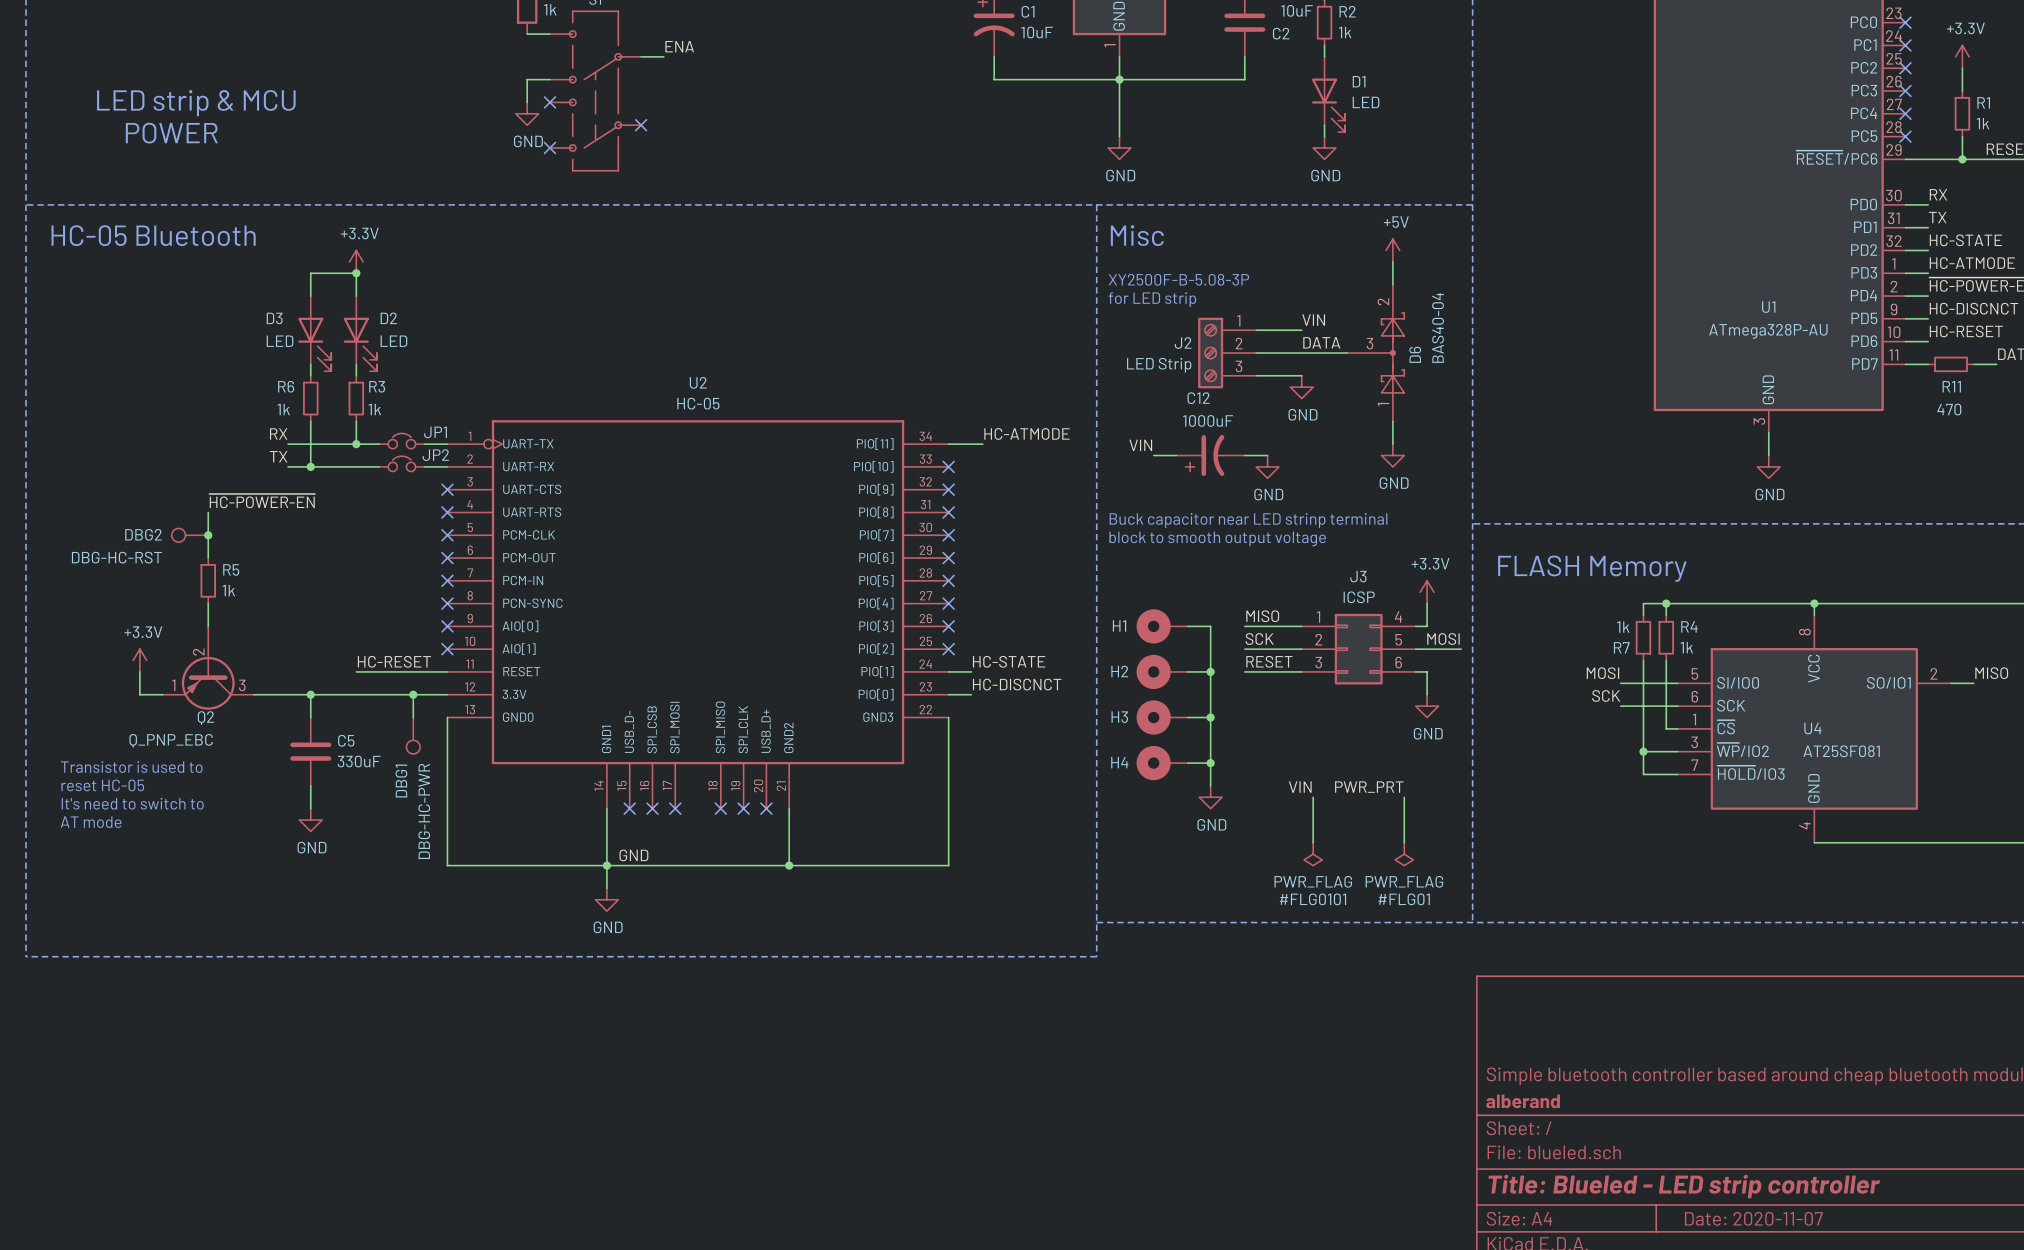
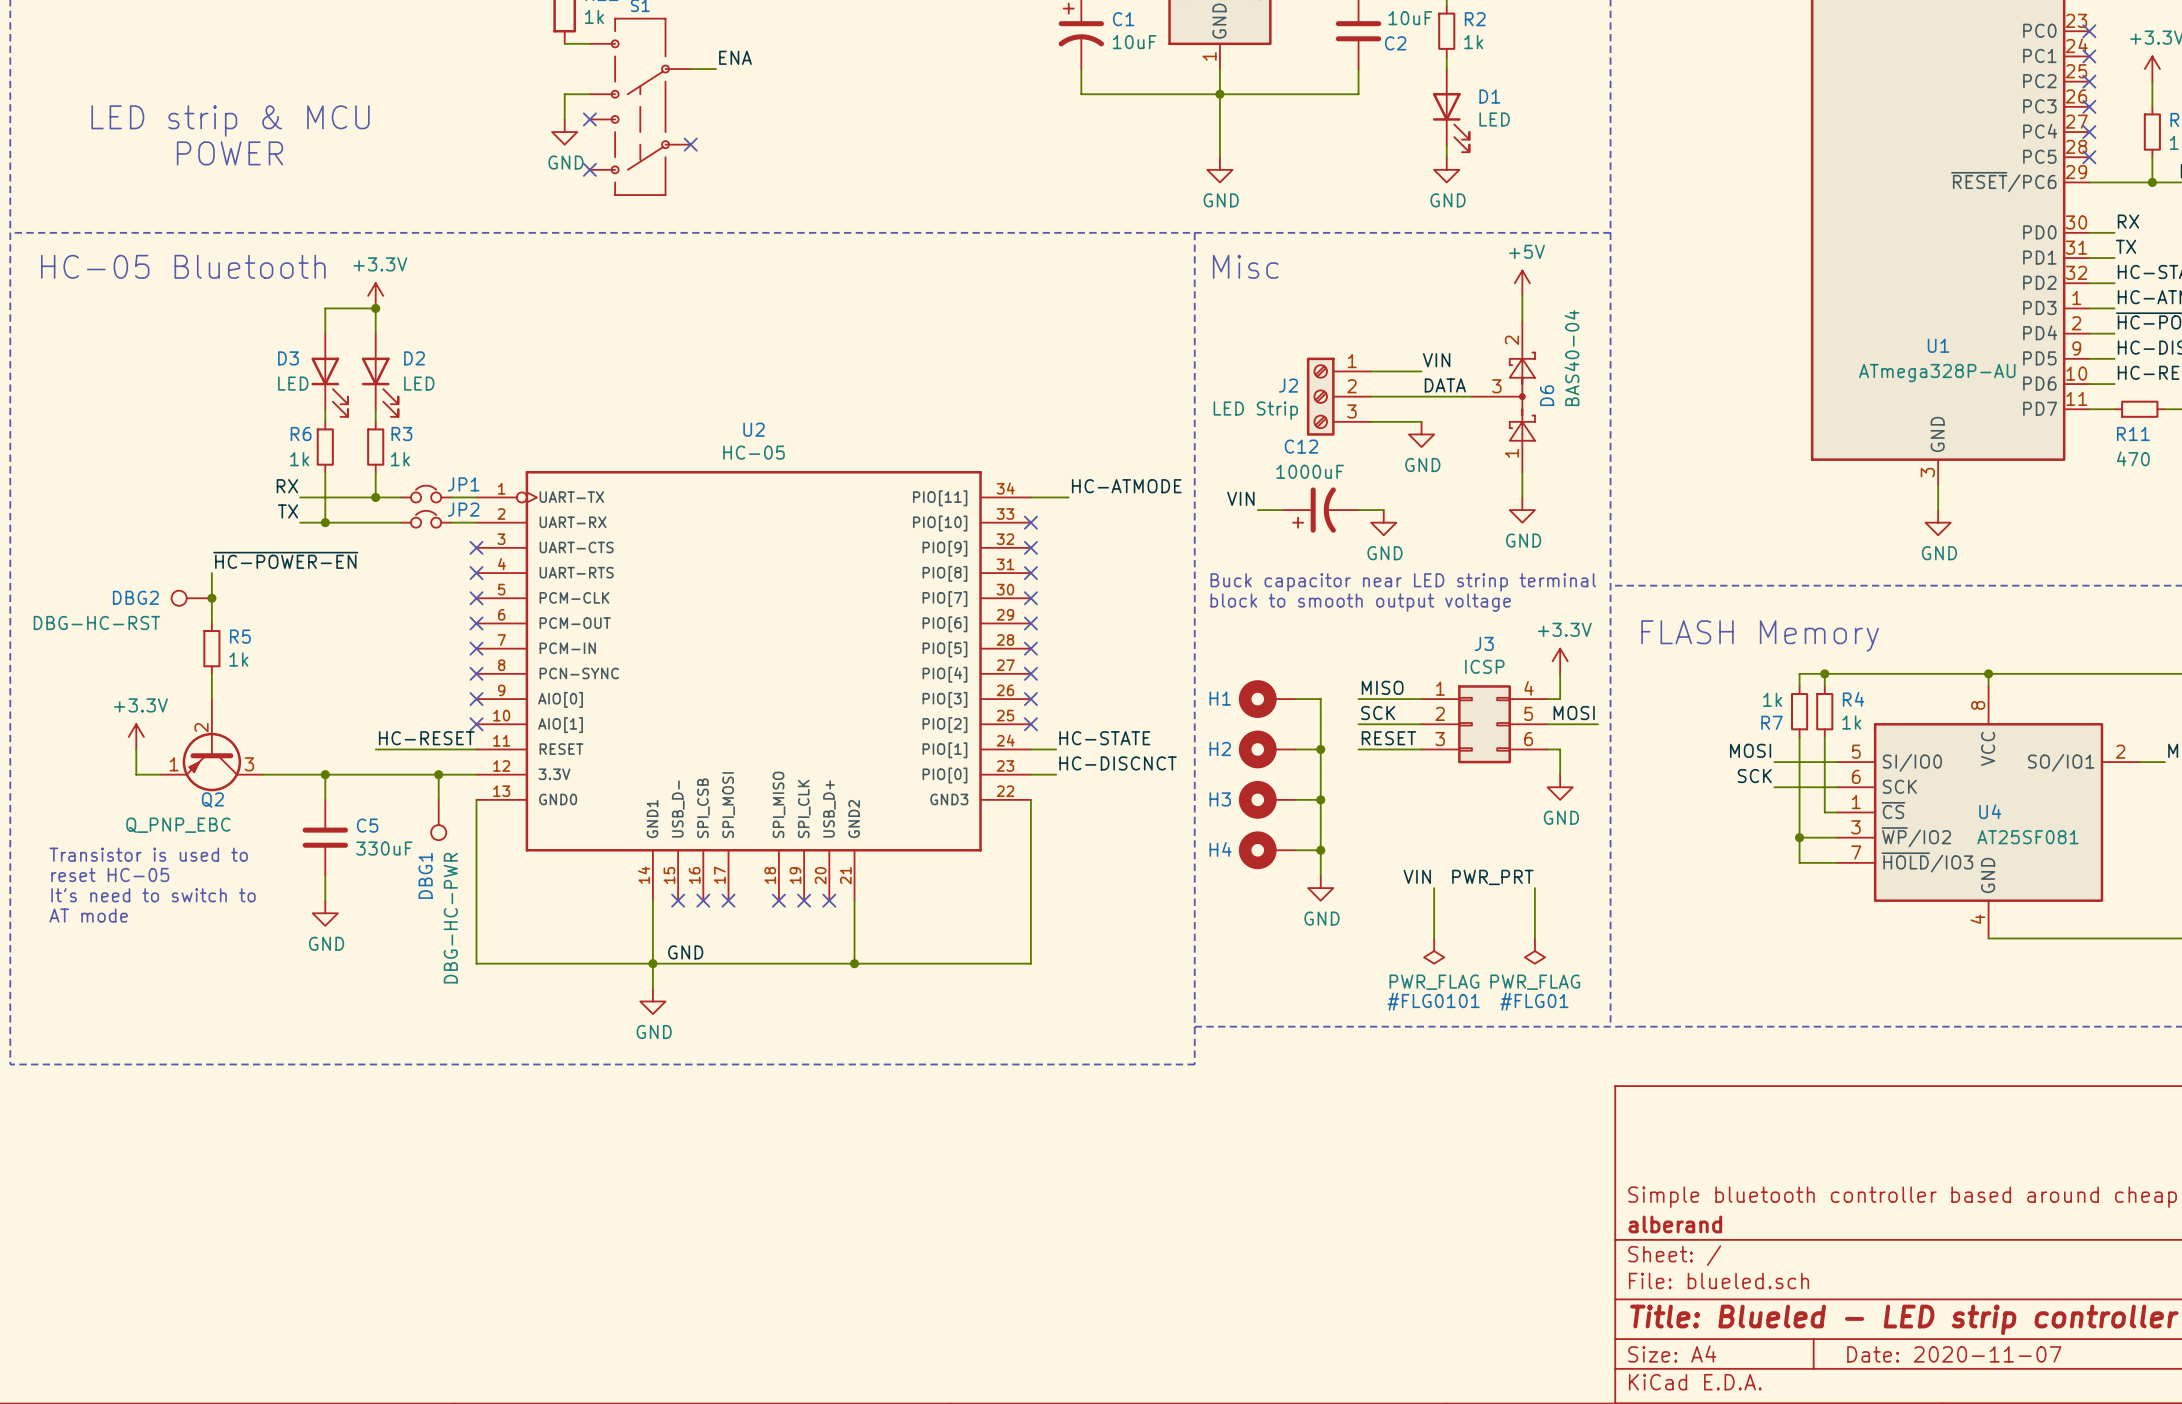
text: XY2500F-B-5.08-3P (1178, 279) -> none
text: for LED strip (1152, 299) -> none

